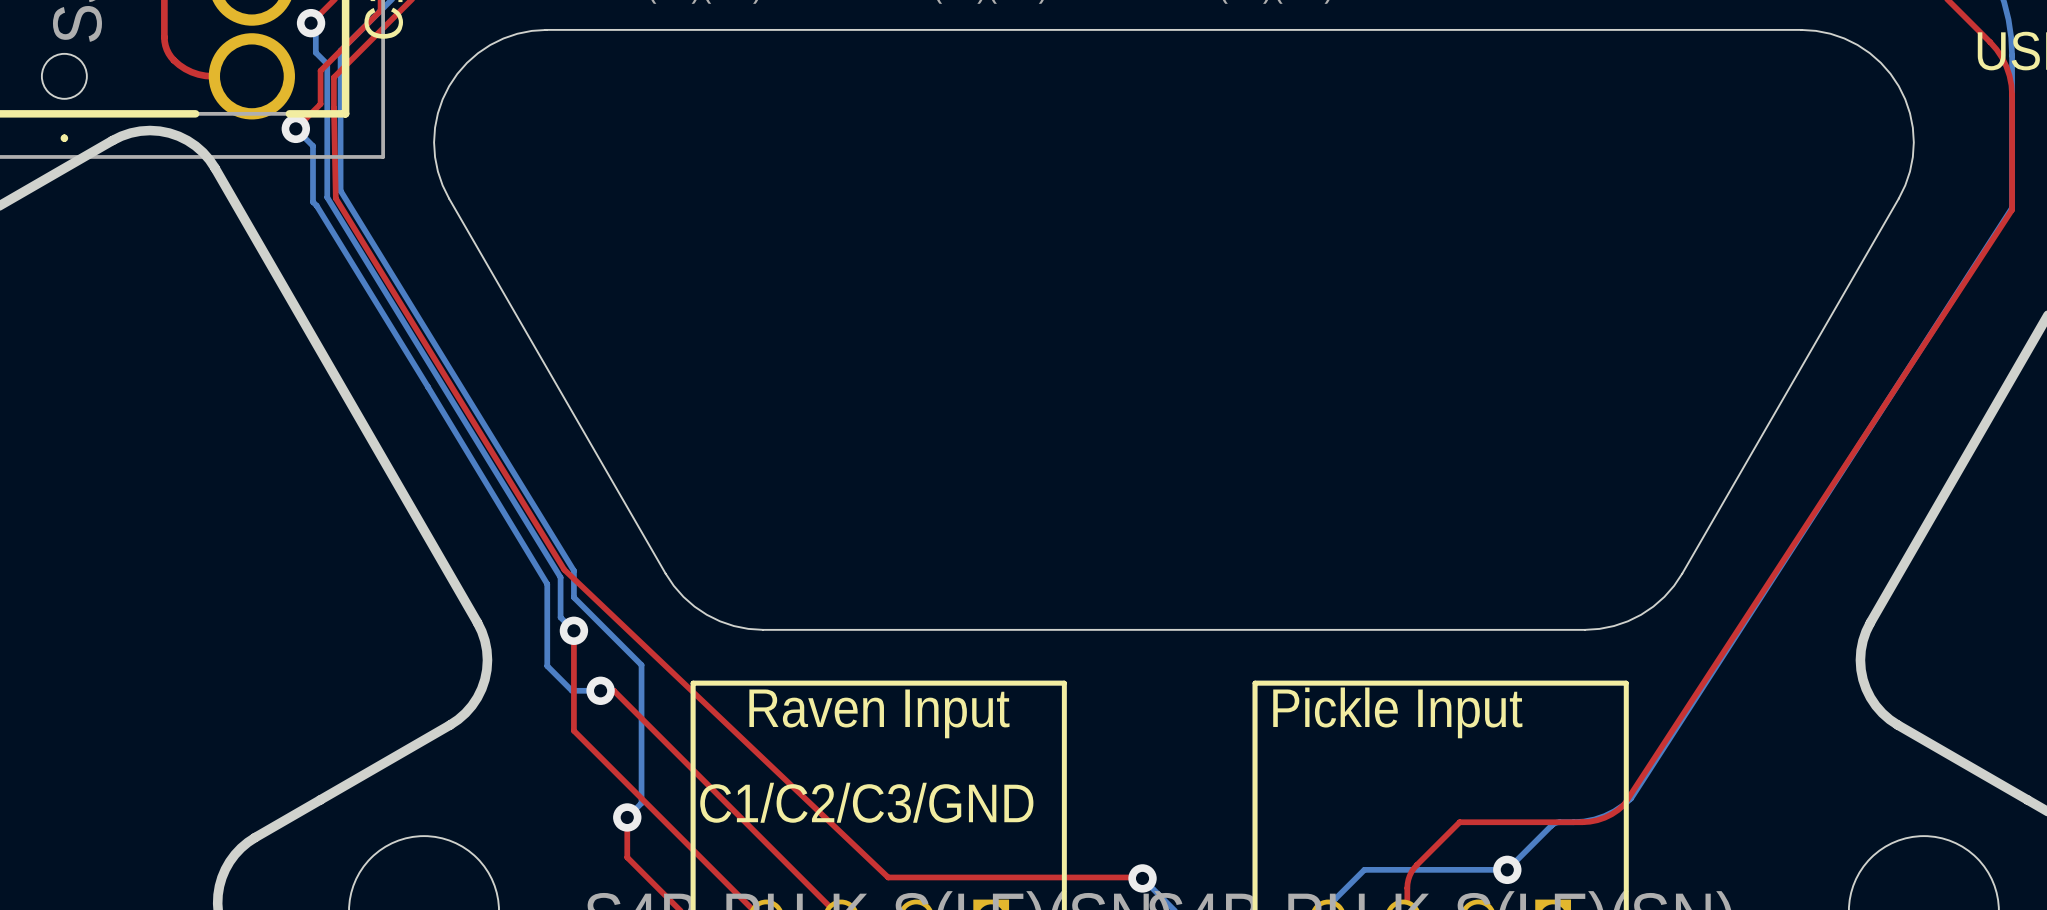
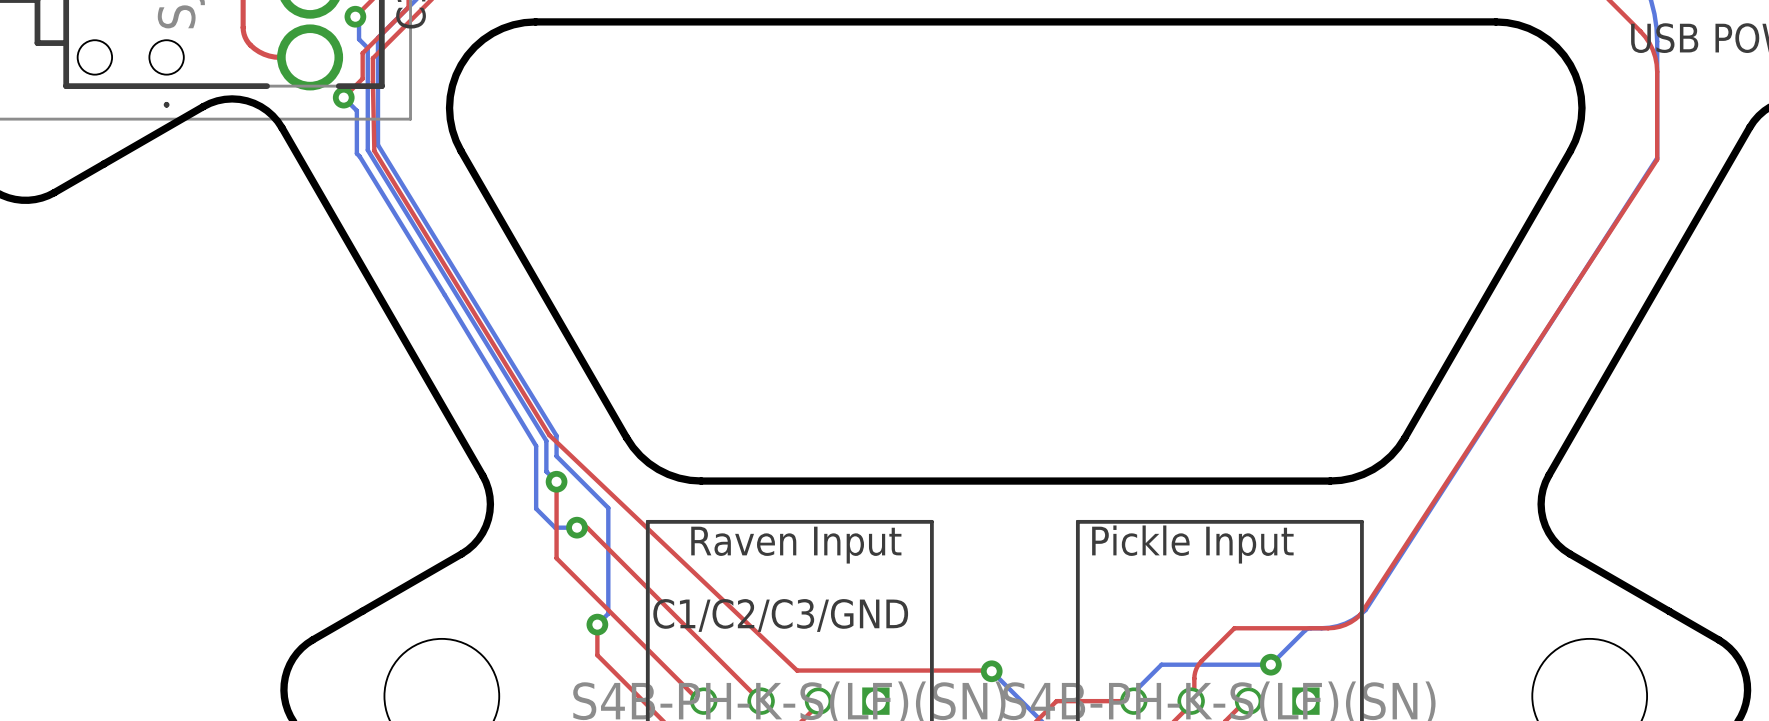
board edge width: thin (546, 29) (1816, 30) (1830, 33) (1857, 44) (1869, 53) (1890, 73) (1905, 99) (1910, 113) (1913, 142) (1912, 157) (1910, 171) (1898, 198) (1682, 573) (1674, 585) (1653, 606) (1627, 621) (1613, 626) (1584, 629) (748, 628) (733, 626) (706, 614) (694, 606) (673, 585) (449, 198) (437, 171) (434, 142) (437, 113) (442, 99) (457, 73) (478, 53) (490, 44) (517, 33) (546, 29) -> thick (535, 21) (1507, 22) (1538, 33) (1564, 55) (1579, 85) (1581, 119) (1570, 151) (1404, 438) (1382, 463) (1363, 474) (1330, 481) (690, 480) (658, 469) (633, 447) (461, 151) (452, 130) (449, 108) (452, 85) (467, 55) (492, 33) (513, 24) (535, 21)

